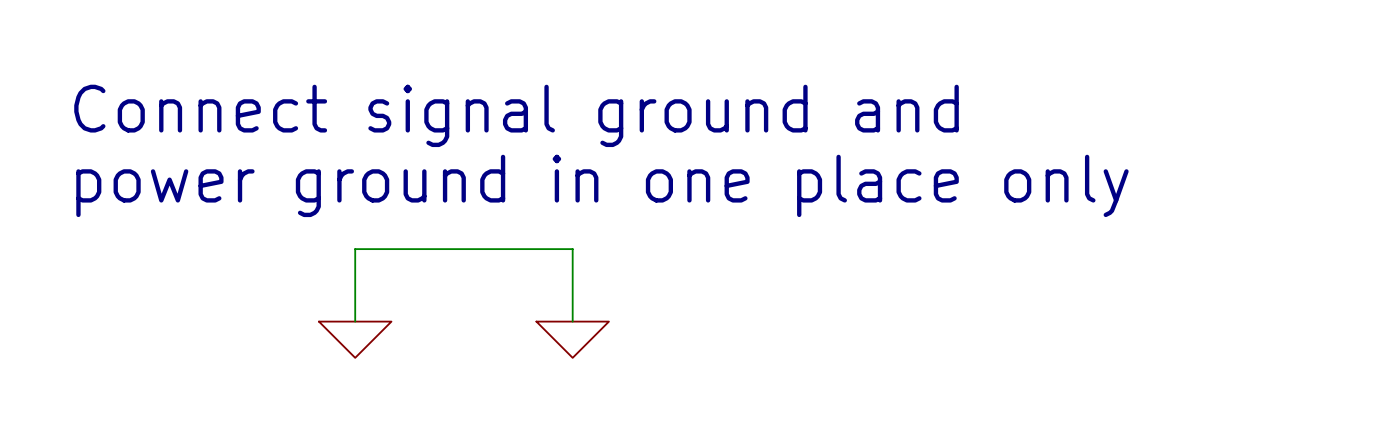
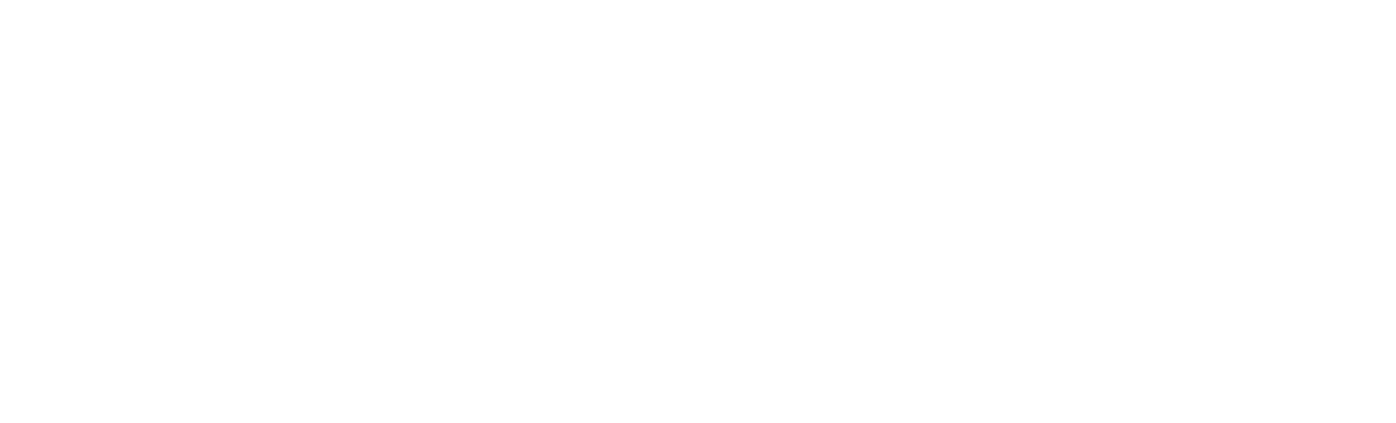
text: Connect signal ground and (516, 115) -> none
text: power ground in one place only (602, 185) -> none
wire: (355, 321) (355, 249) (572, 249) (572, 321) -> none
power symbol: (355, 339) -> none
power symbol: (572, 339) -> none

